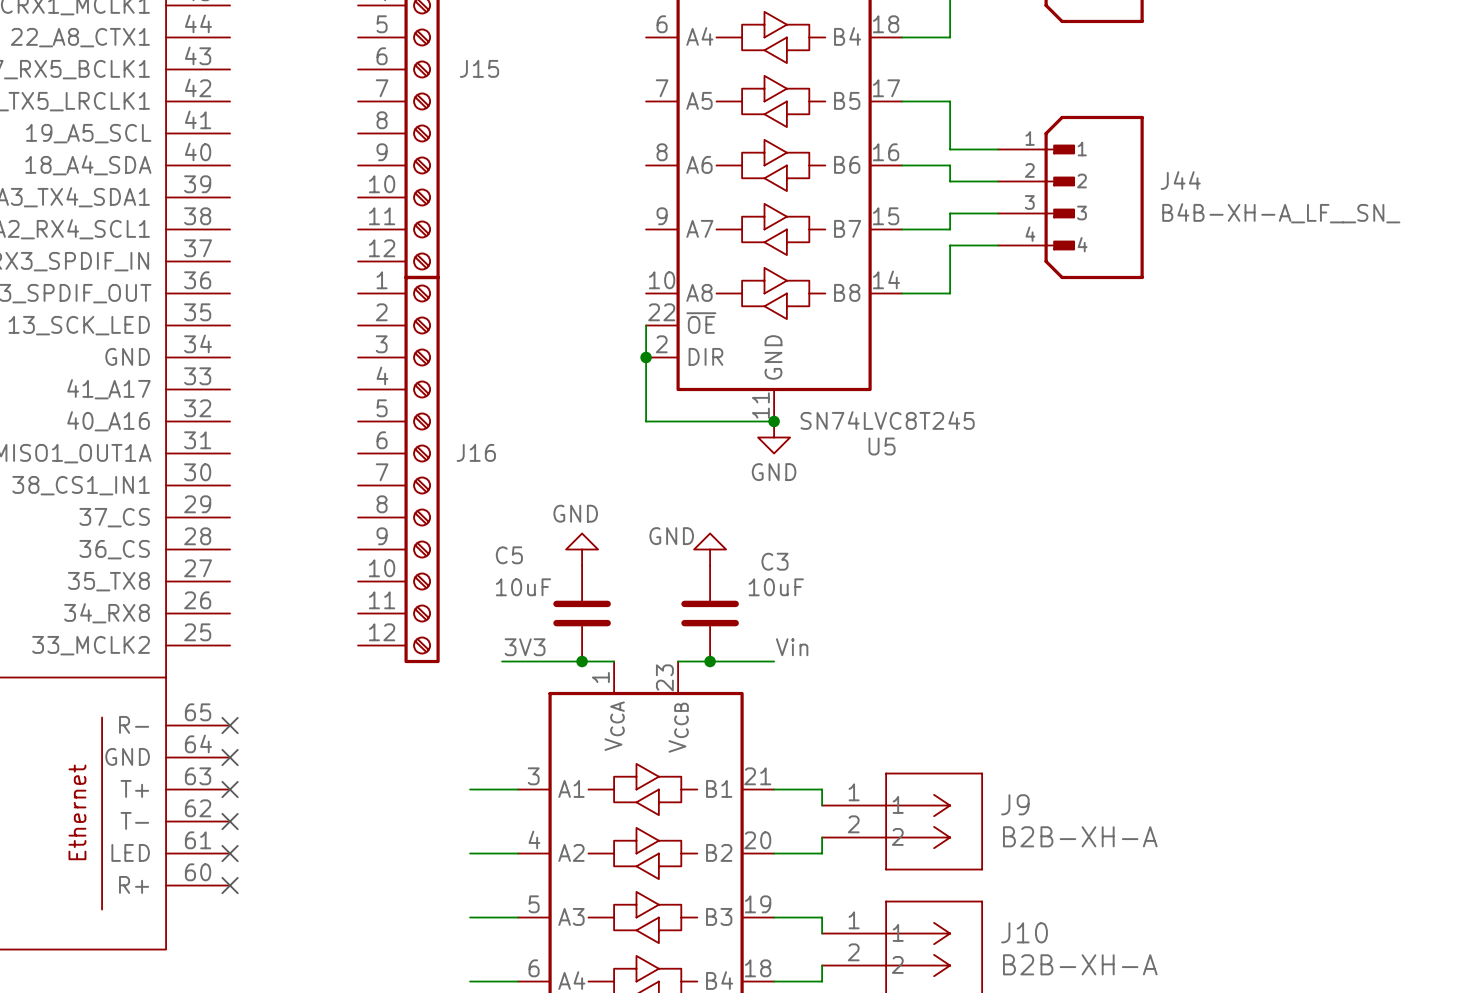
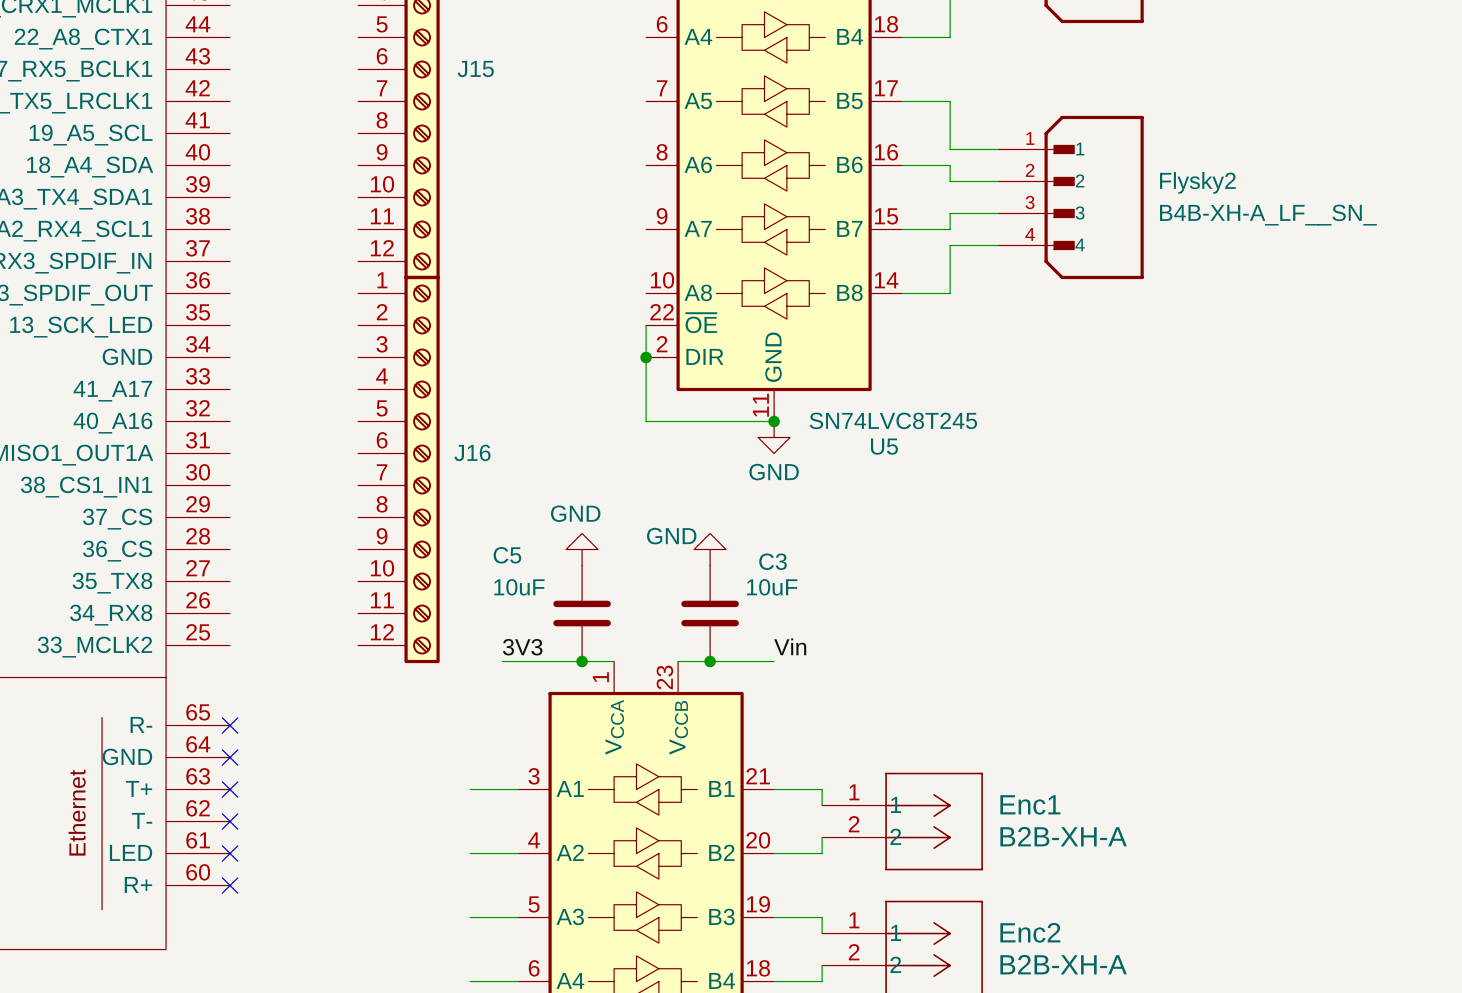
J44 name: J44 (1180, 180) -> Flysky2 (1197, 182)
J9 name: J9 (1015, 804) -> Enc1 (1030, 804)
J10 name: J10 (1024, 932) -> Enc2 (1030, 932)

